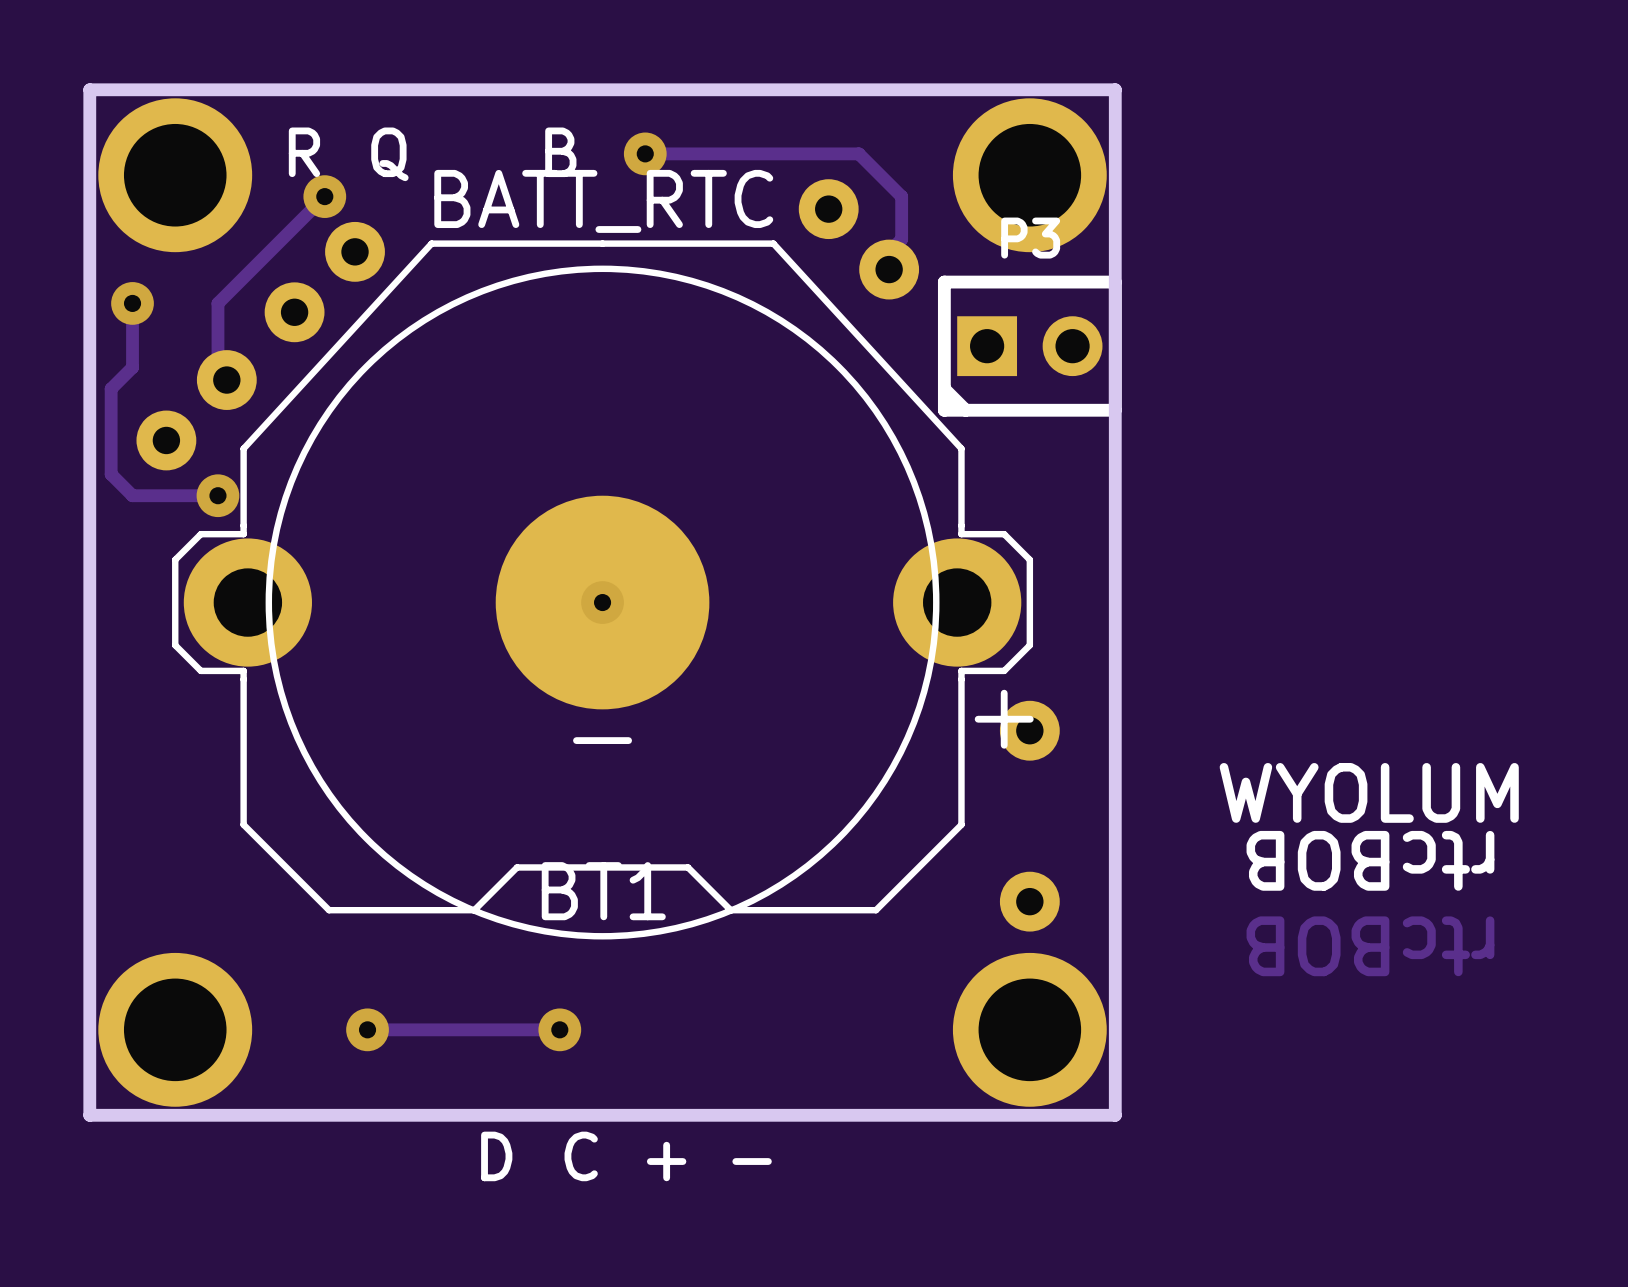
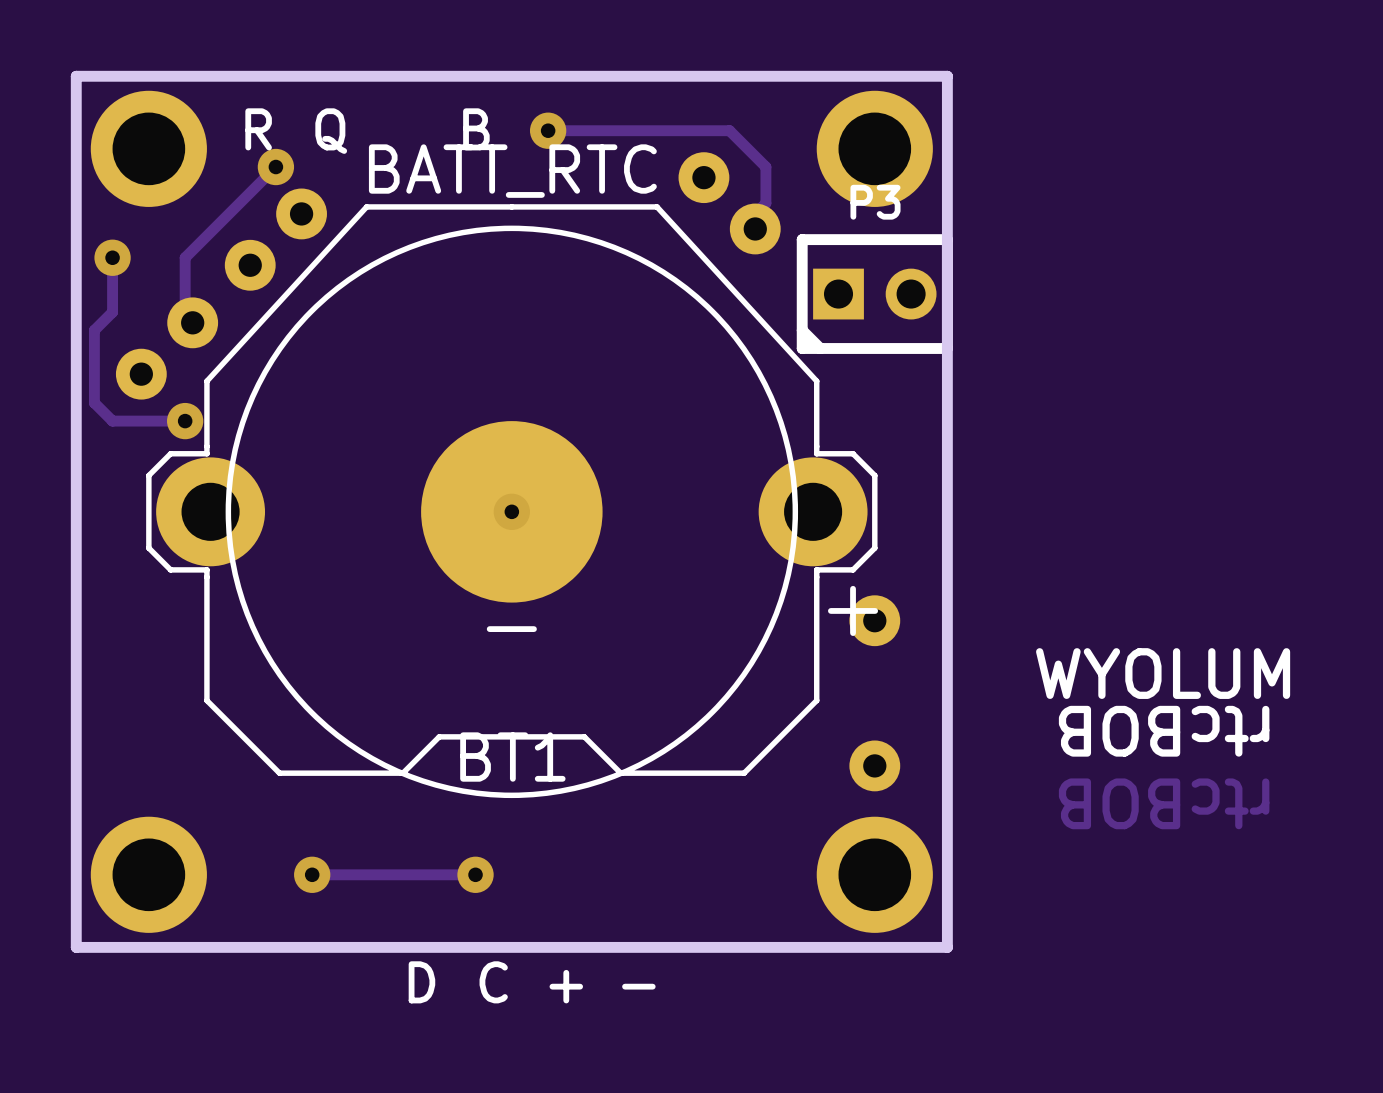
part footprint: [98, 98, 253, 253] -> [90, 90, 207, 207]
part footprint: [952, 98, 1107, 253] -> [816, 90, 933, 207]
part footprint: [98, 952, 253, 1107] -> [90, 816, 207, 933]
part footprint: [952, 952, 1107, 1107] -> [816, 816, 933, 933]

